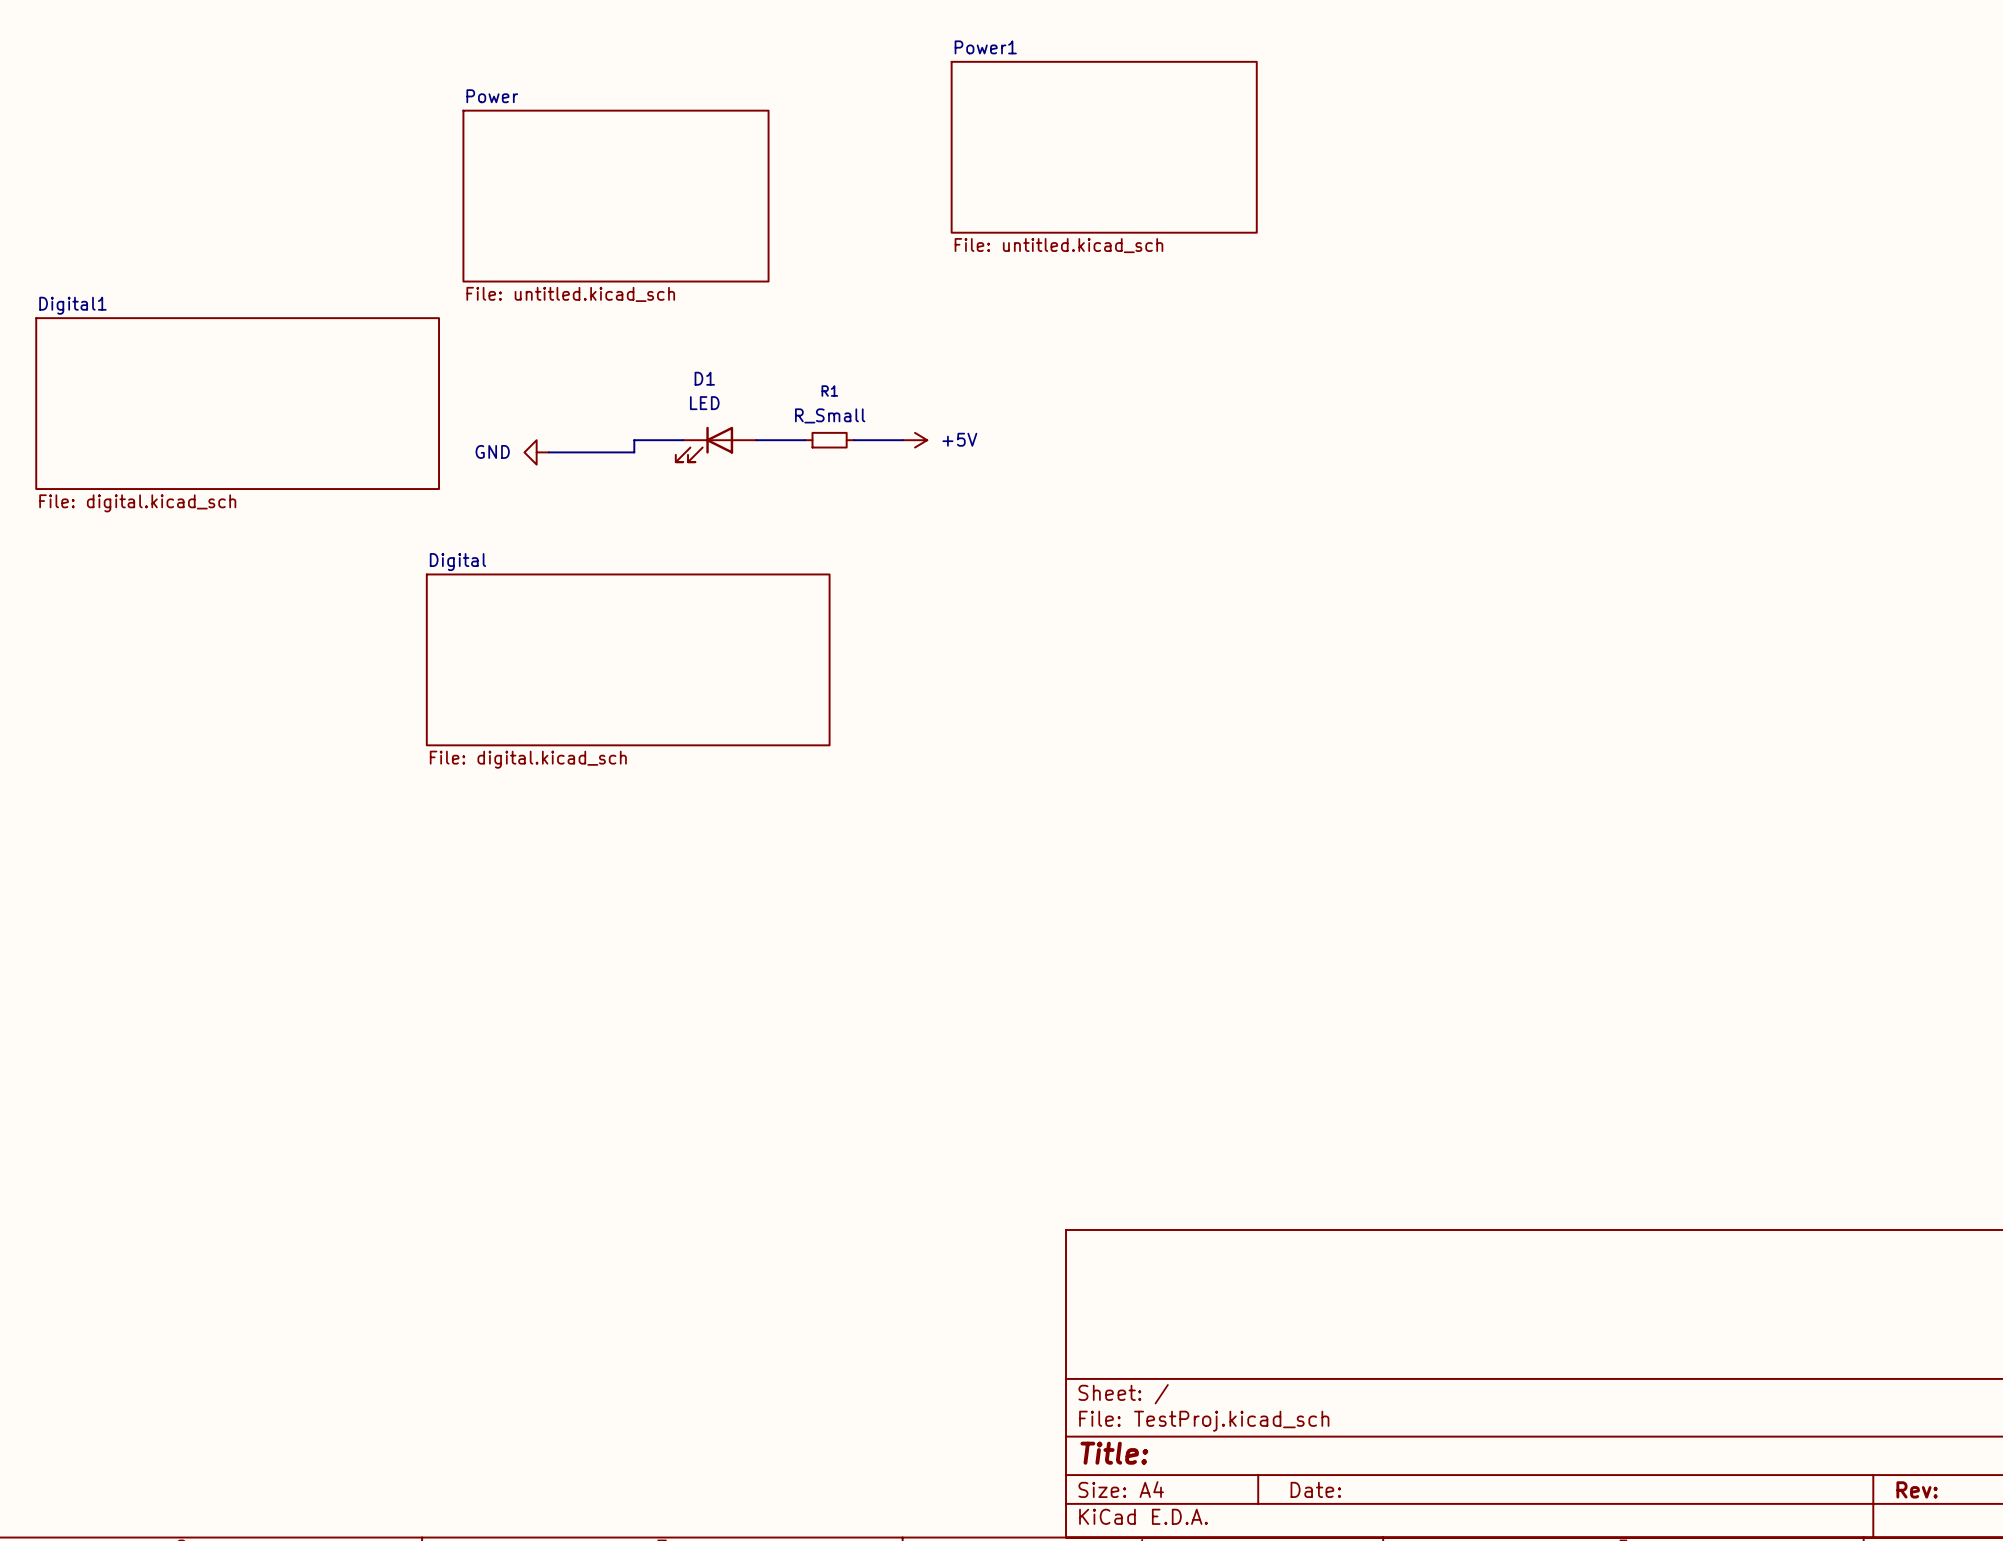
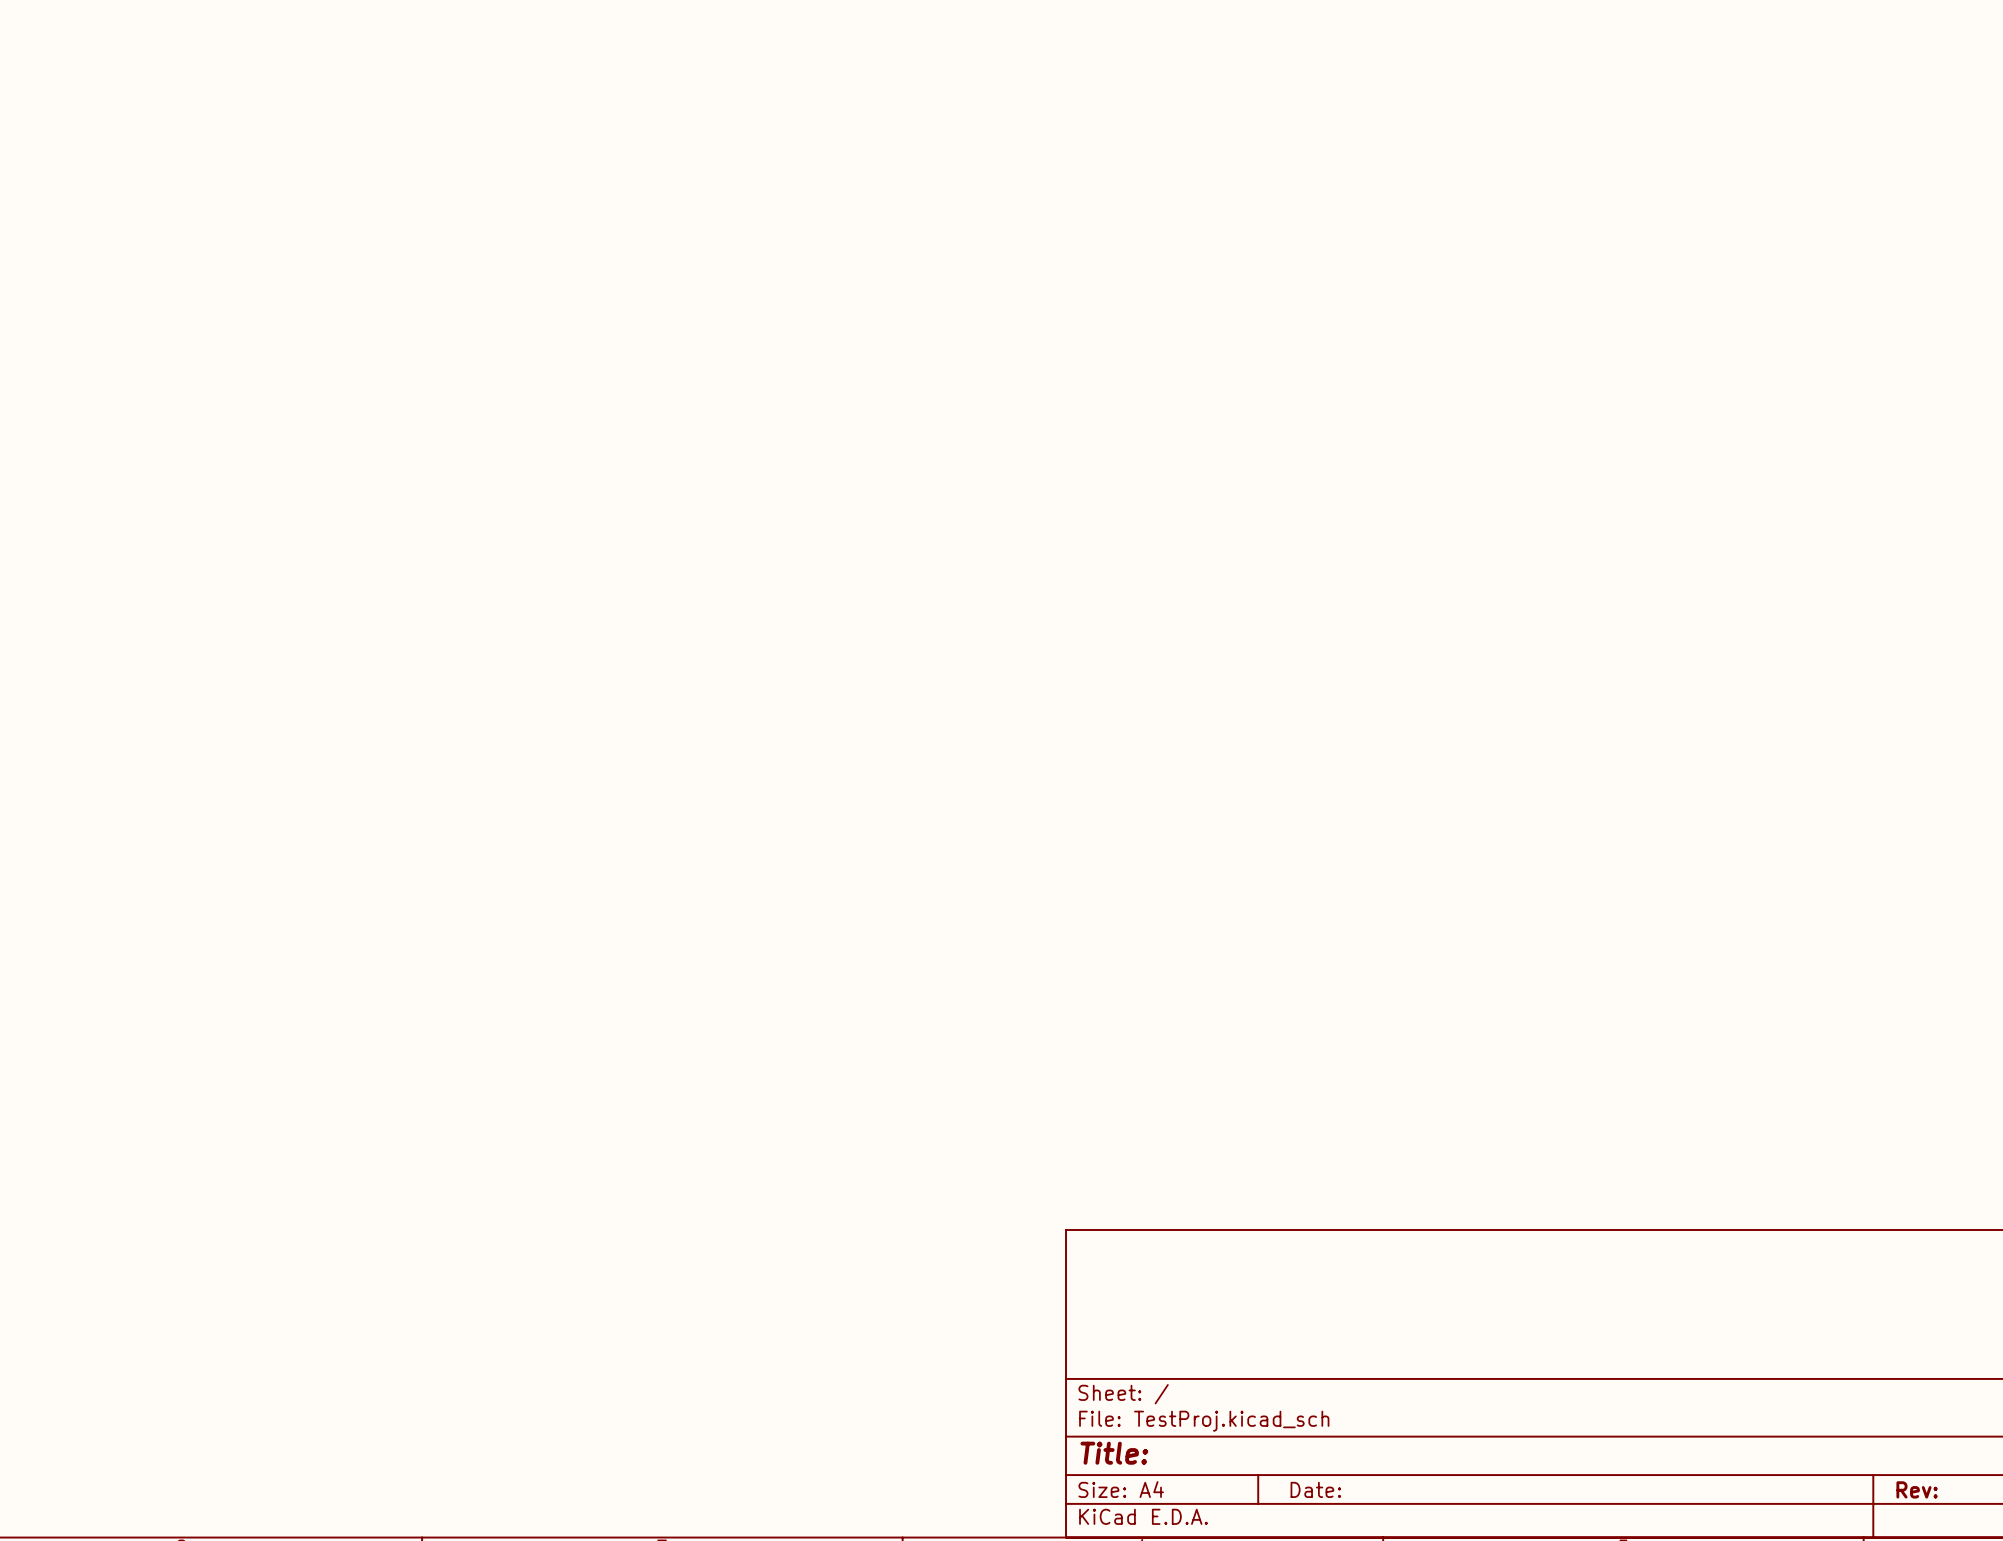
sheet Power1: File: untitled.kicad_sch (1104, 147) -> none
sheet Power: File: untitled.kicad_sch (615, 196) -> none
sheet Digital1: File: digital.kicad_sch (237, 403) -> none
wire: (683, 440) (634, 440) (634, 452) (548, 452) -> none
wire: (756, 440) (805, 440) -> none
R1: R_Small (829, 440) -> none
wire: (853, 440) (902, 440) -> none
power symbol: +5V (915, 440) -> none
D1: LED (716, 444) -> none
power symbol: GND (536, 452) -> none
sheet Digital: File: digital.kicad_sch (628, 659) -> none

